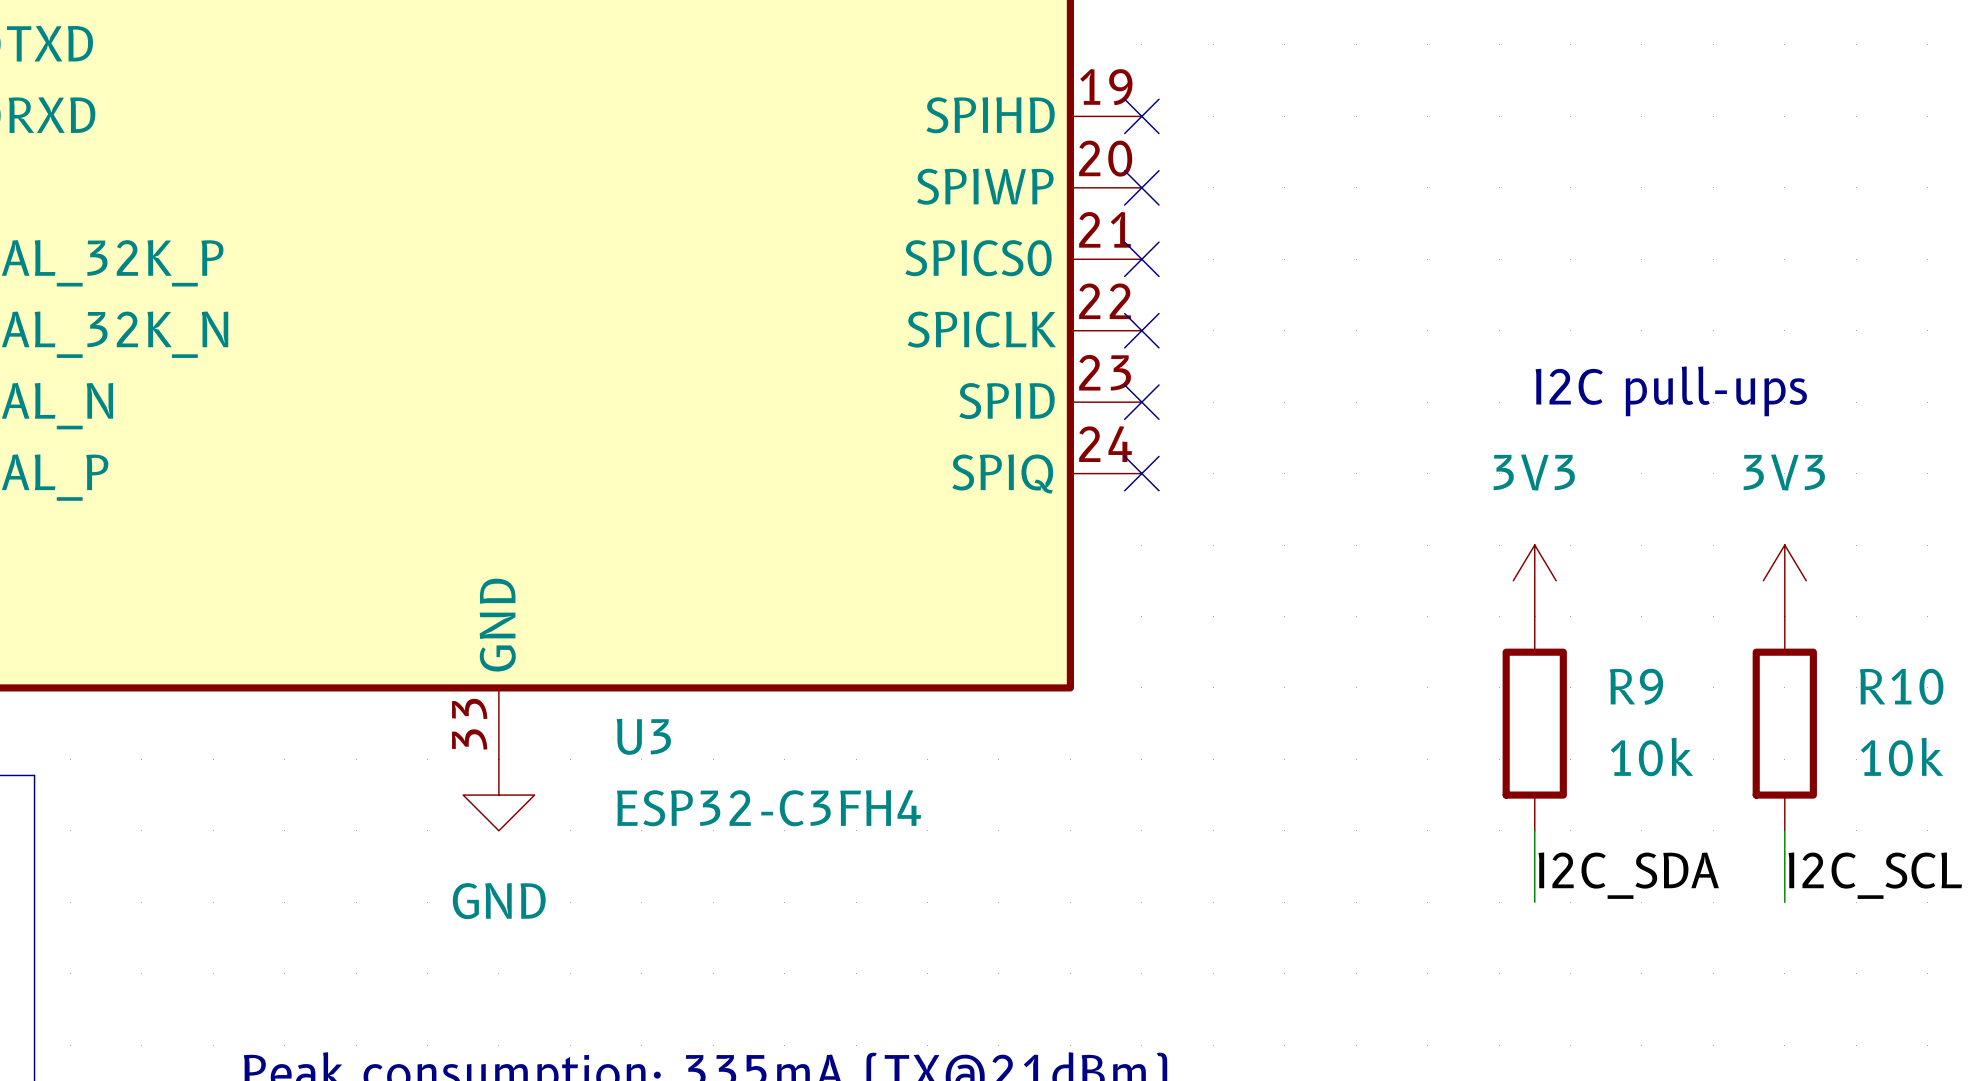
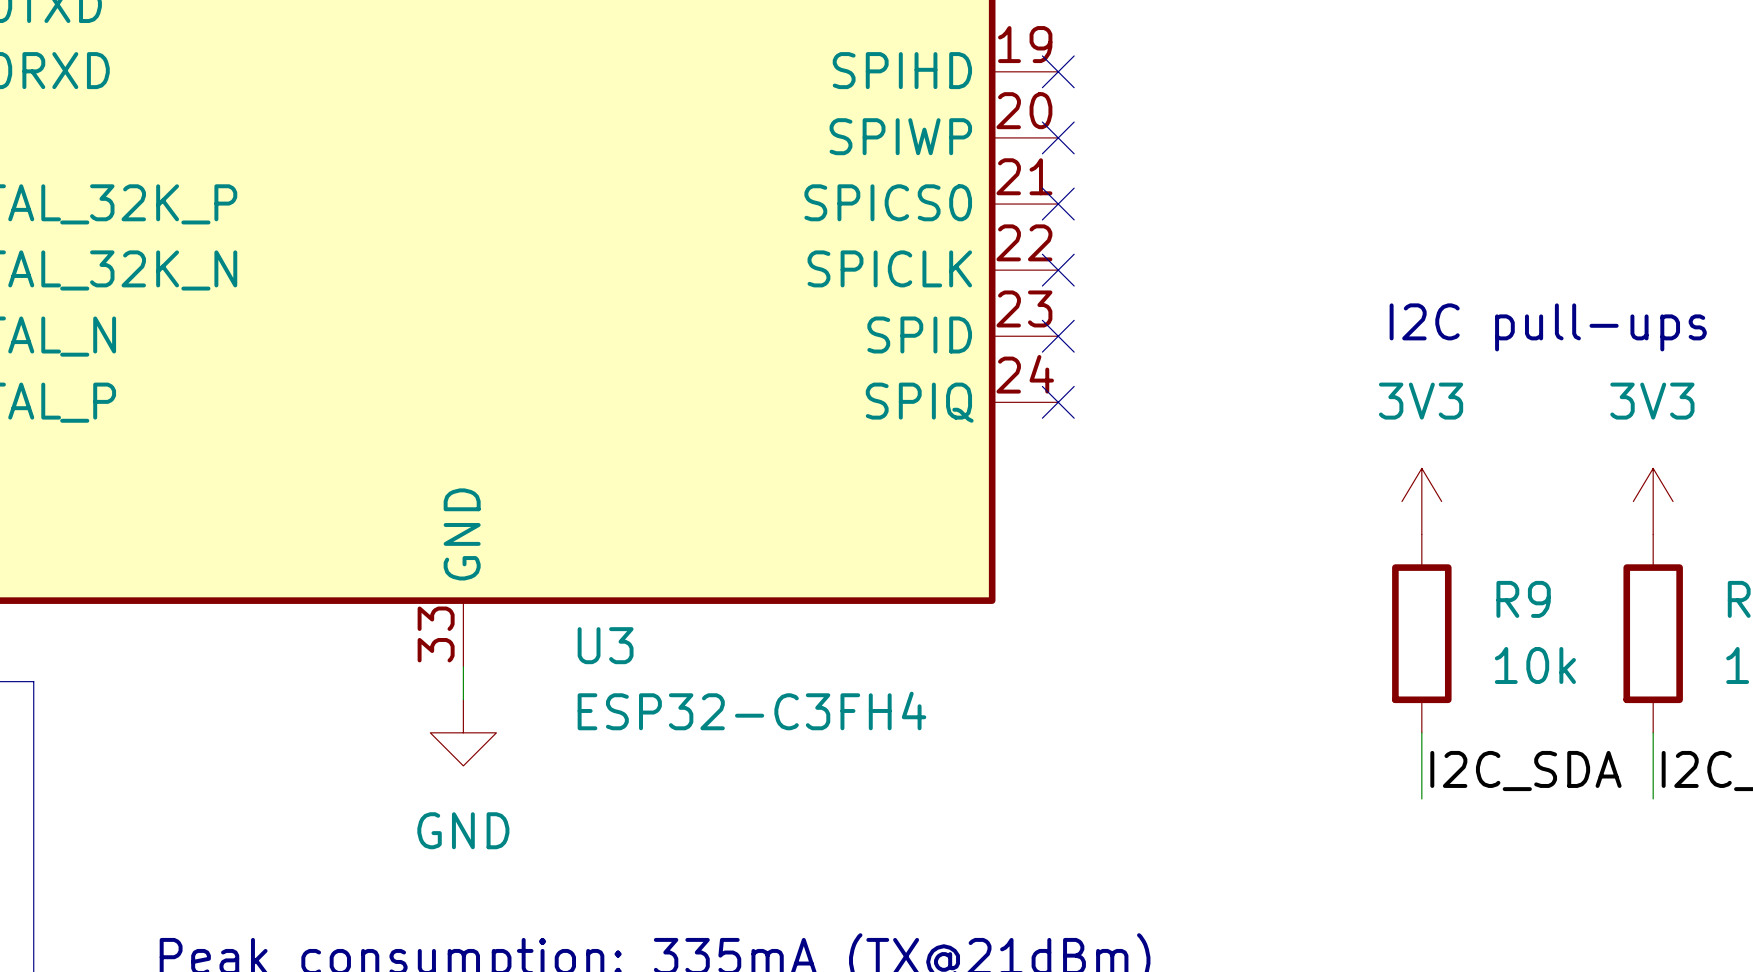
power symbol position: GND (498, 795) -> GND (463, 732)

